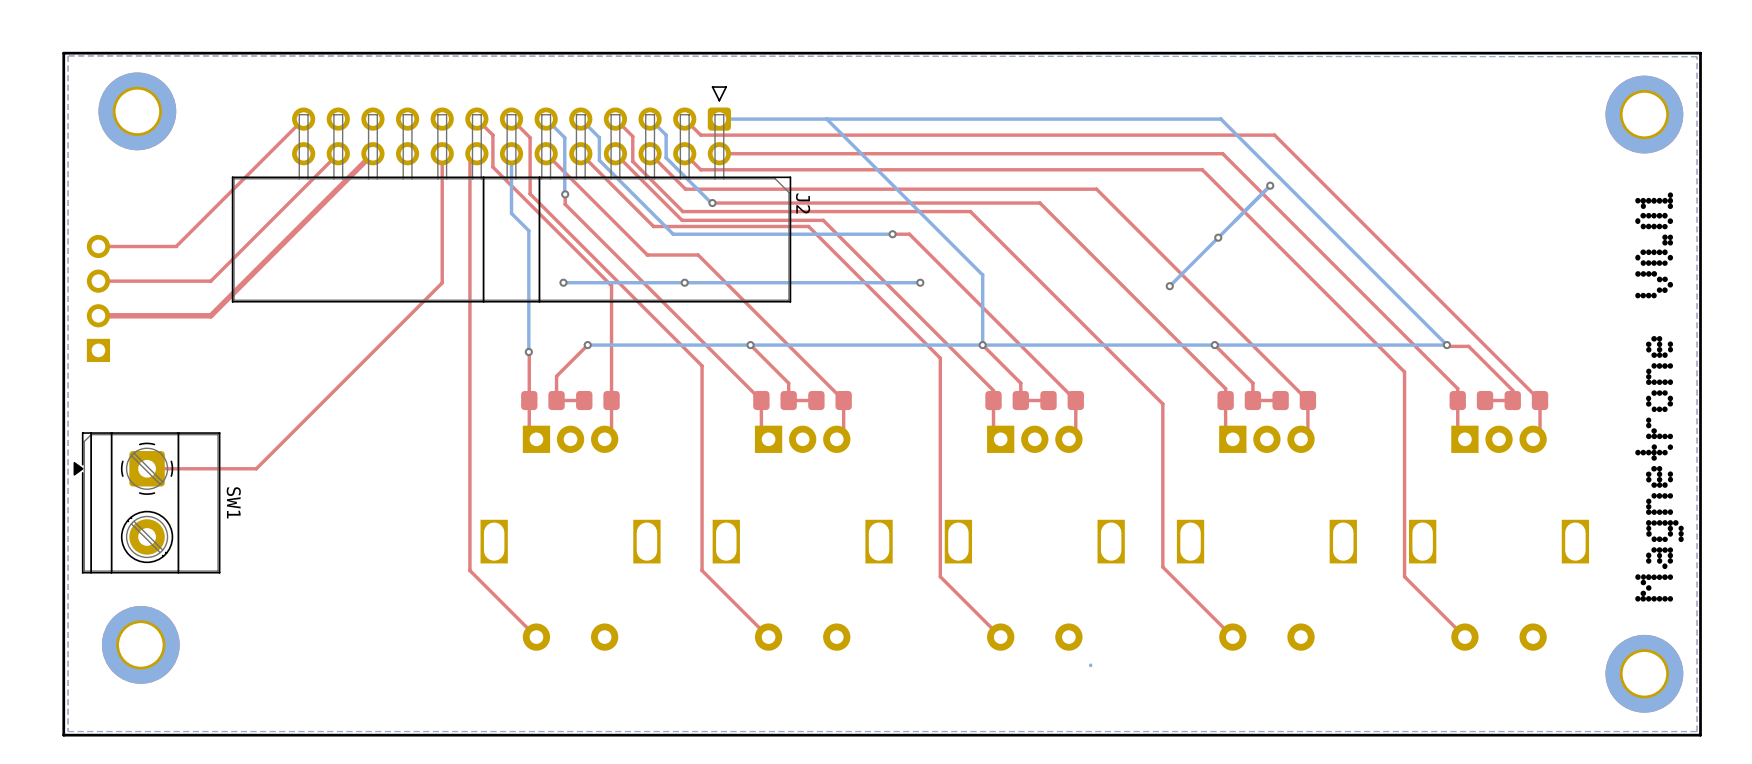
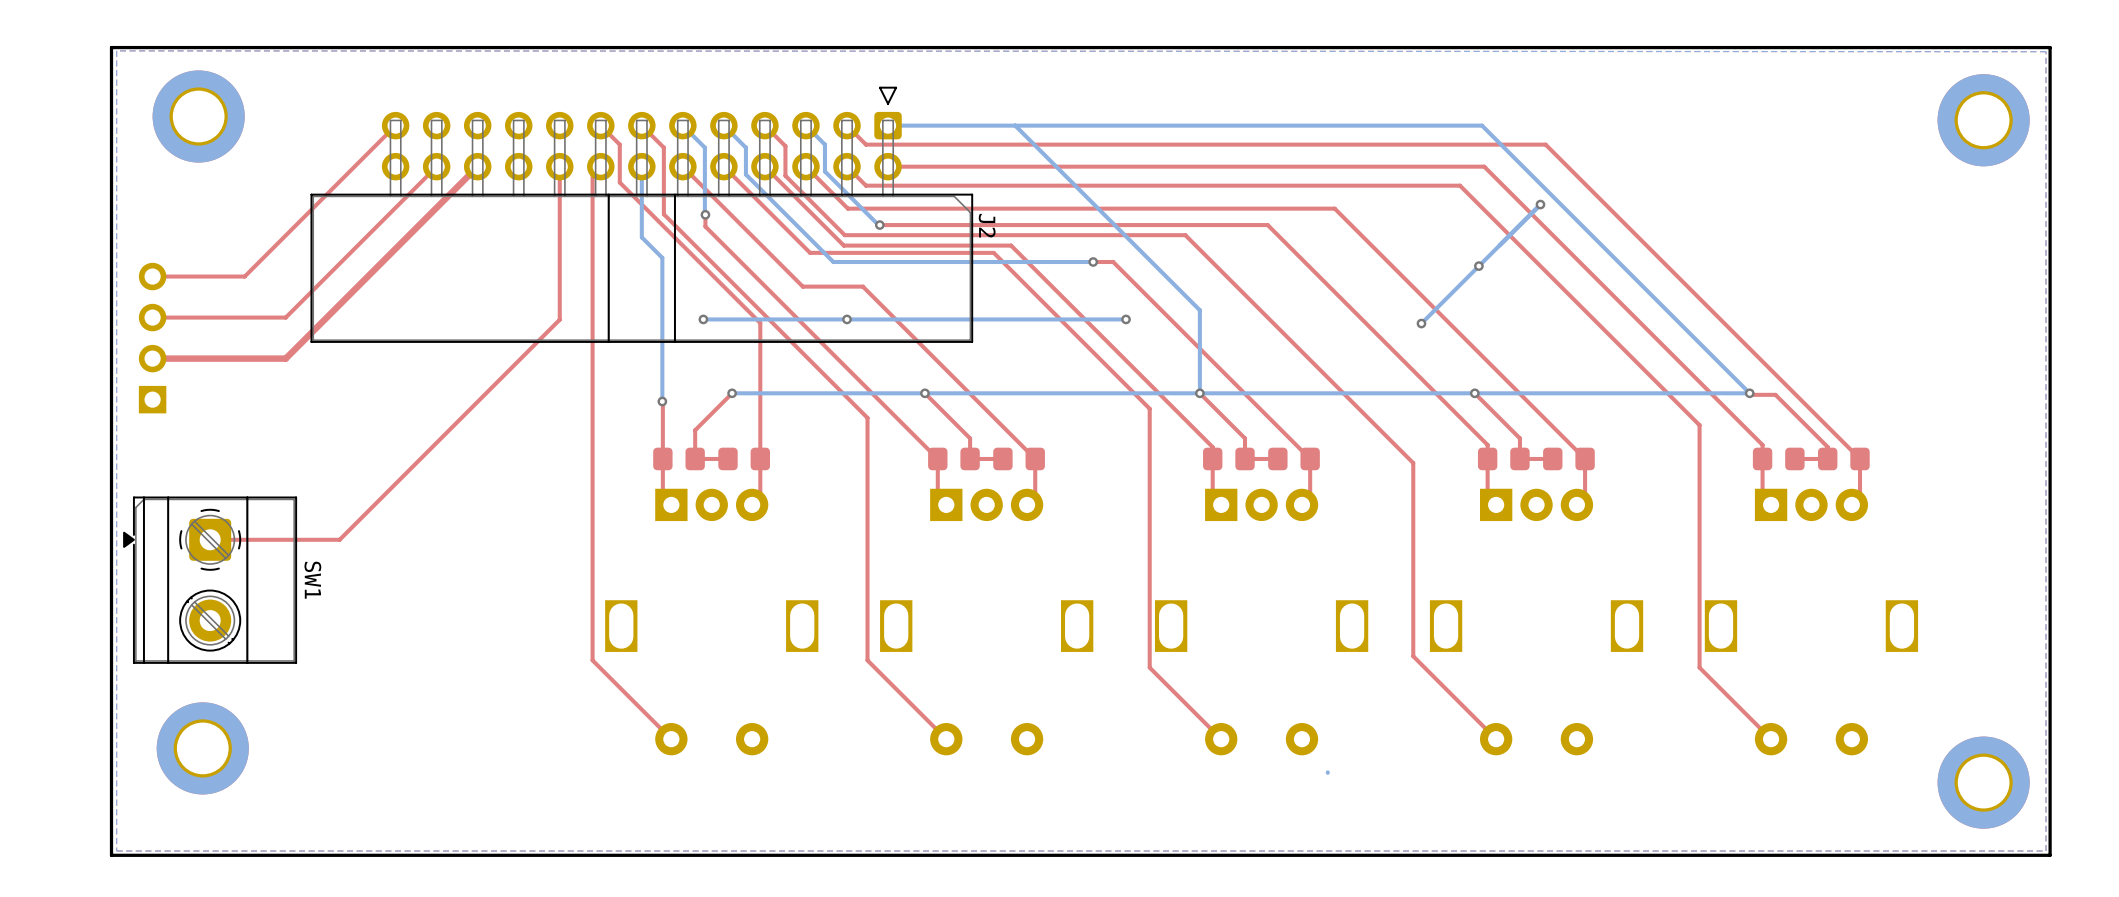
drawing: [1635, 192, 1674, 299] -> none
drawing: [1635, 336, 1684, 602] -> none

